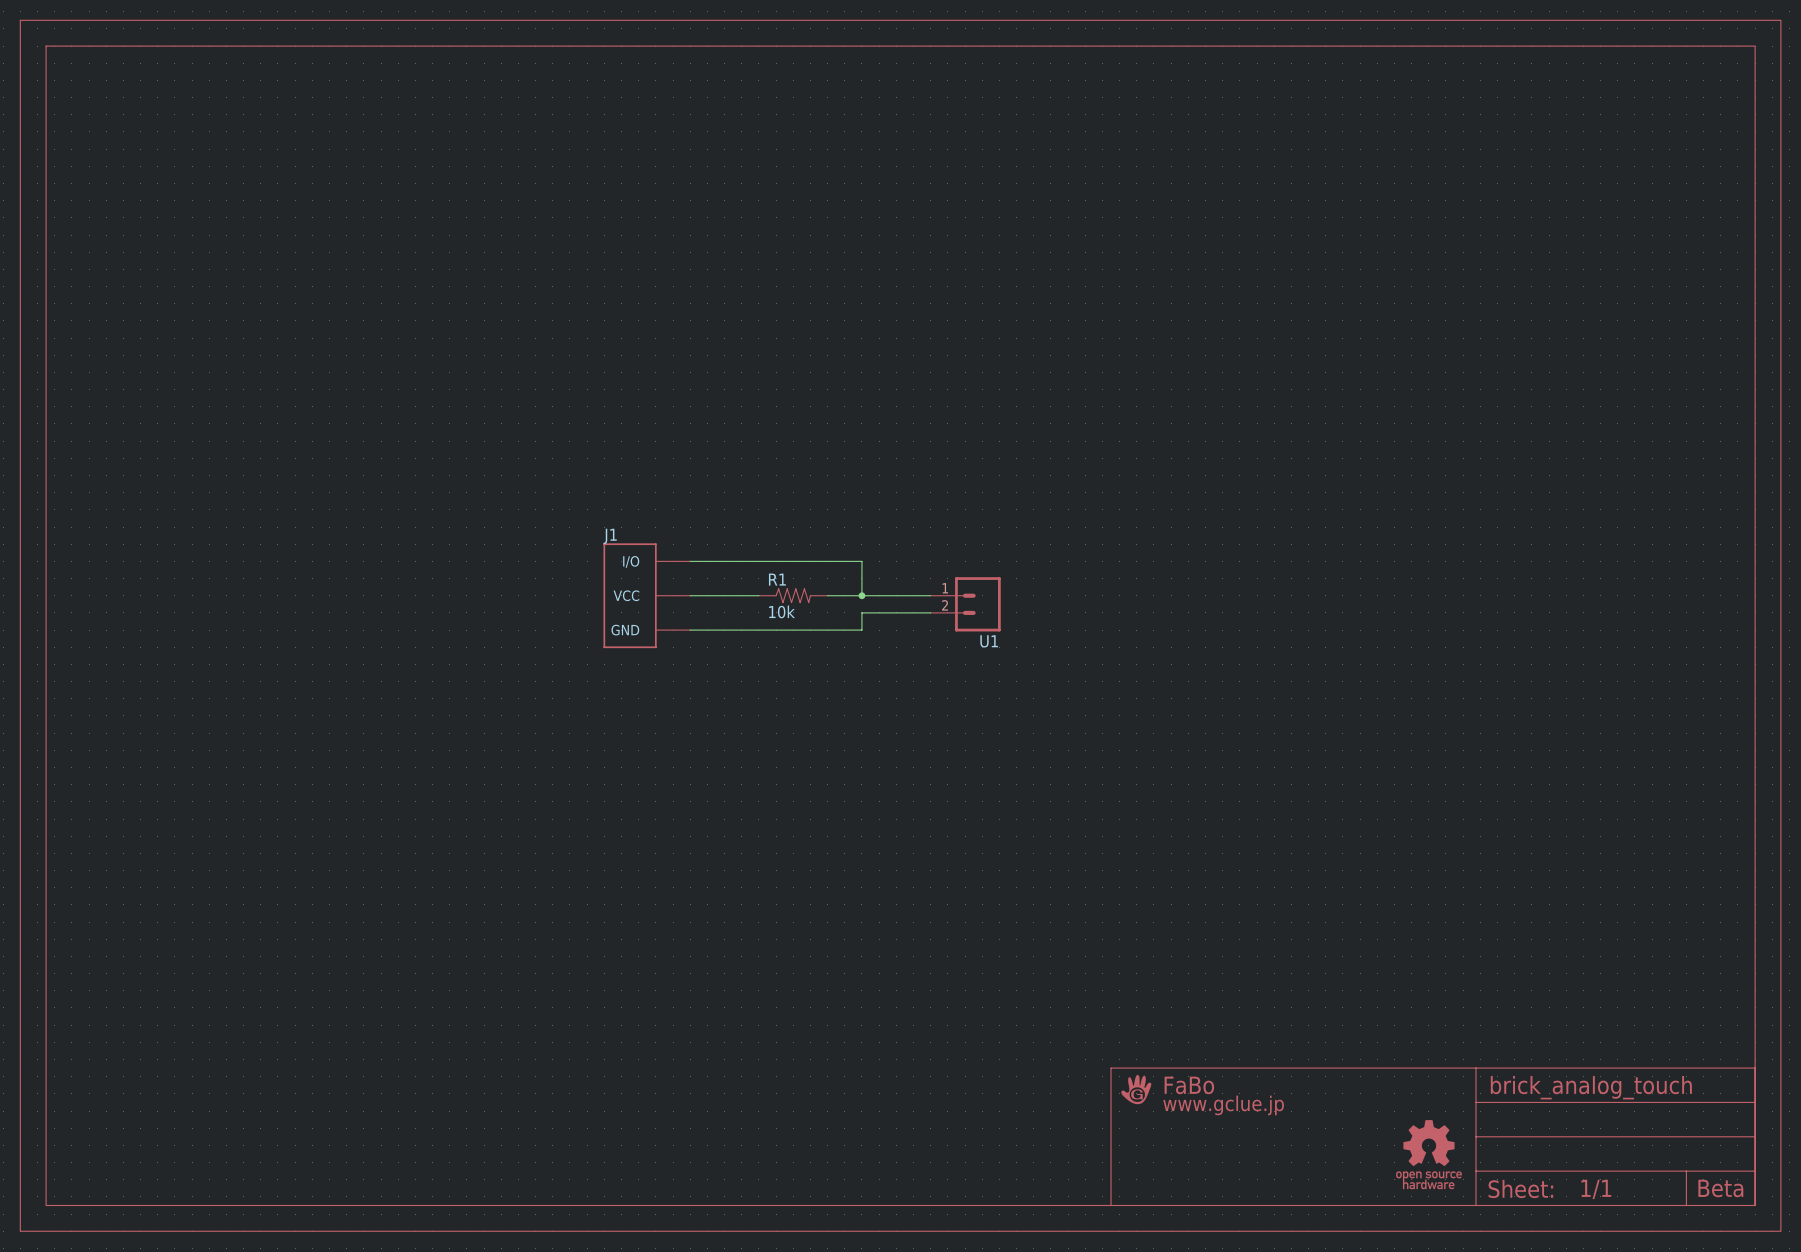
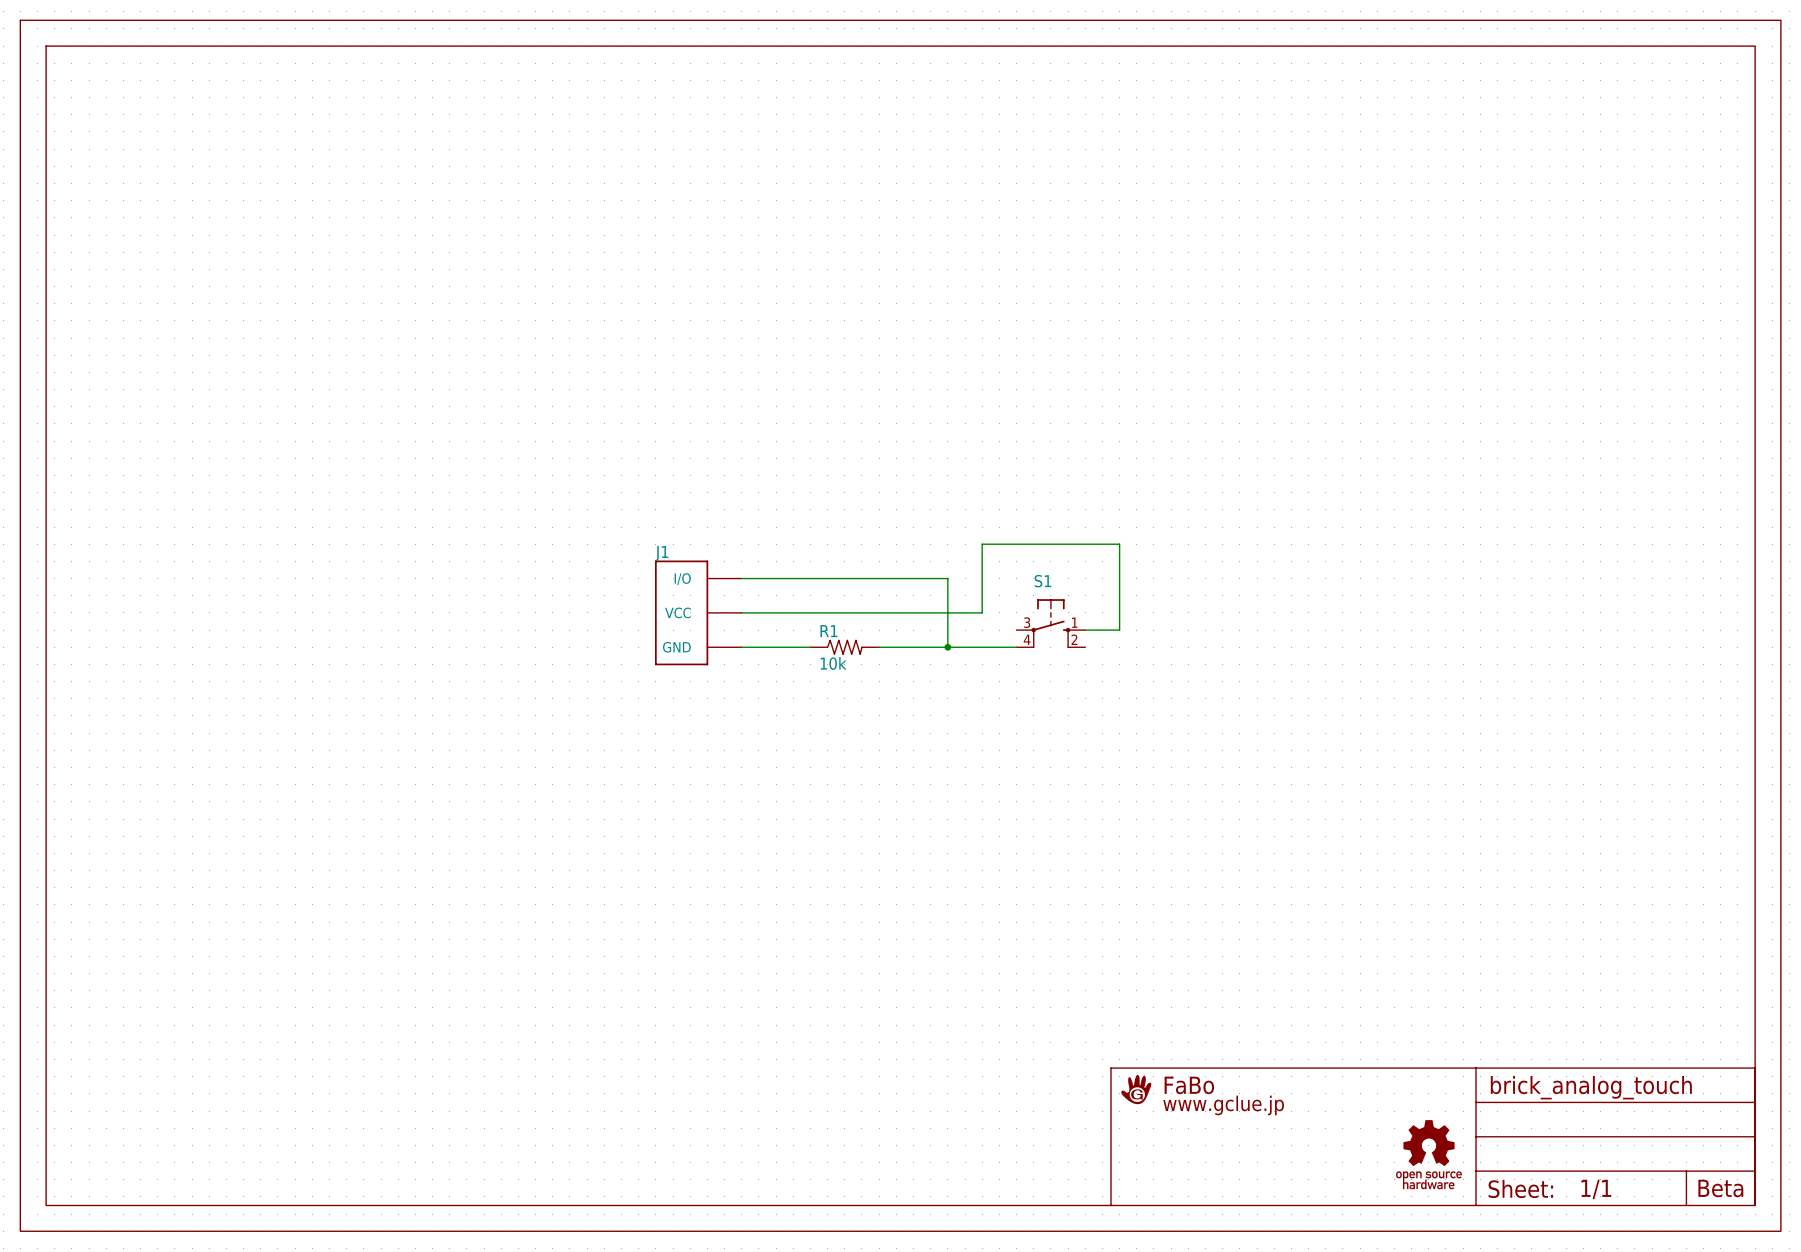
wire: (690, 561) (861, 561) (861, 595) -> none
wire: none -> (741, 578) (947, 578) (947, 647)
J1 position: (646, 595) -> (698, 612)
wire: (690, 595) (758, 595) -> (741, 647) (810, 647)
R1 position: (793, 595) -> (844, 647)
wire: (827, 595) (930, 595) -> none
junction: (861, 595) -> none
U1: (965, 604) -> none
wire: (861, 612) (861, 630) (690, 630) -> (861, 612) (741, 612)
wire: none -> (930, 612) (982, 612) (982, 544) (1119, 544) (1119, 630) (1085, 630)
S1: none -> (1050, 623)
wire: none -> (879, 647) (1016, 647)
junction: none -> (947, 647)

